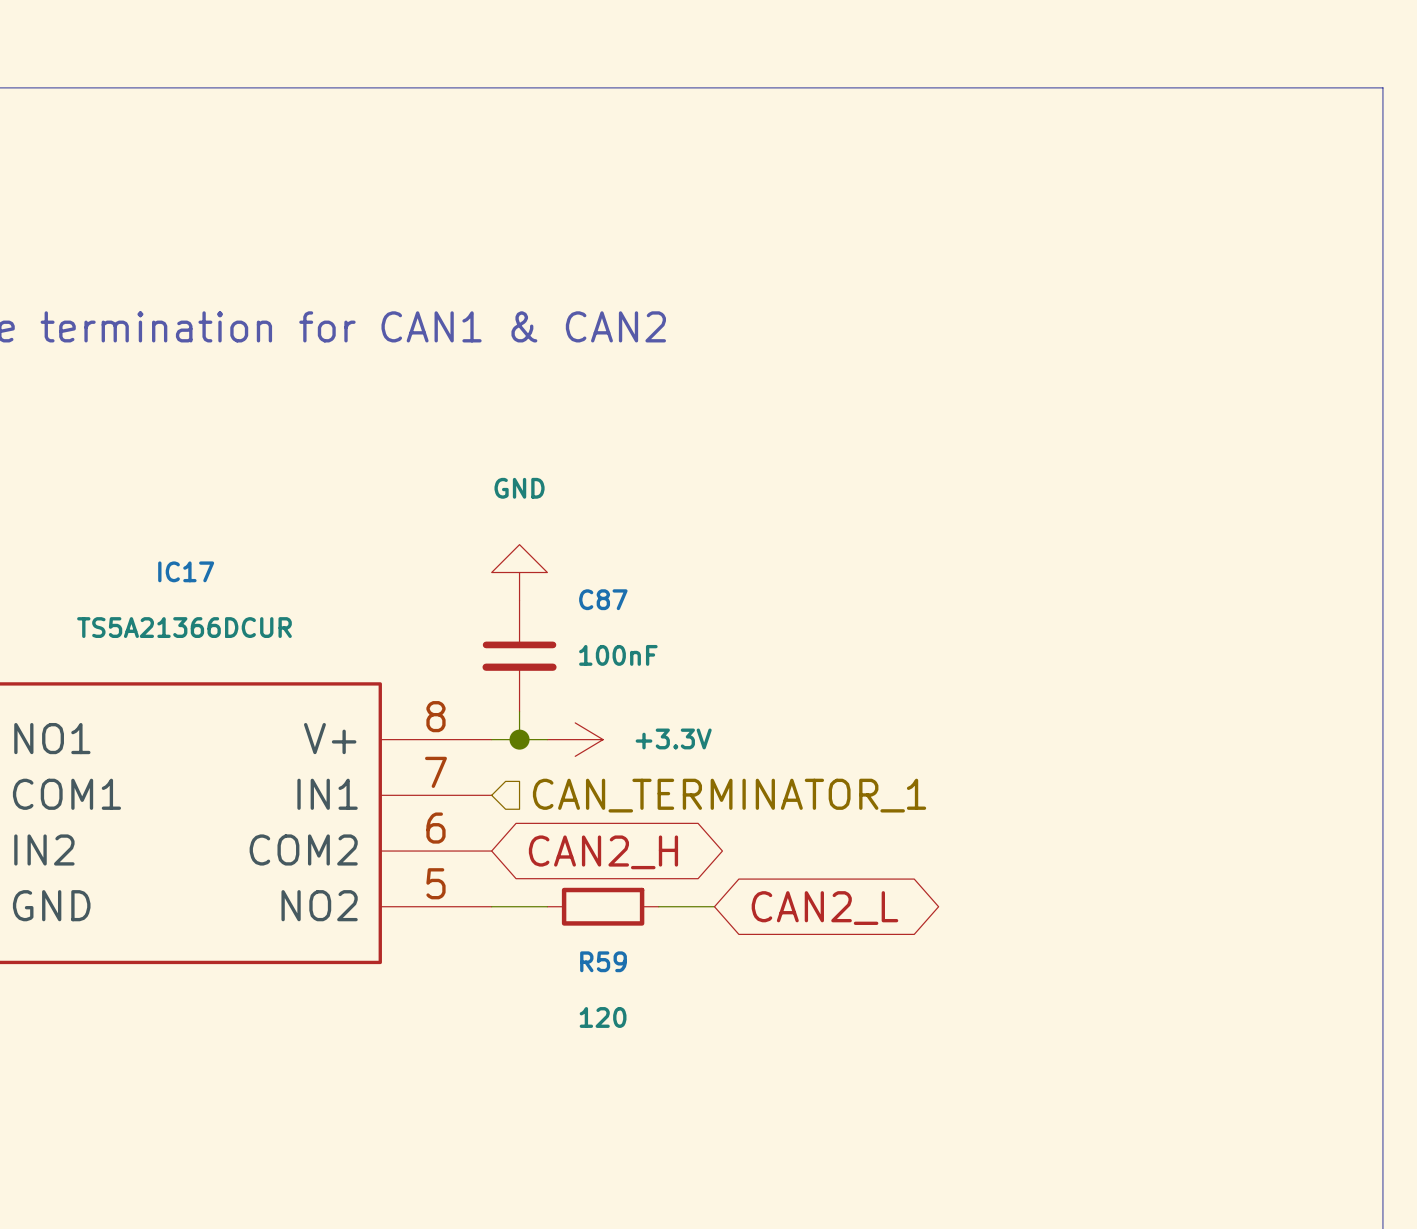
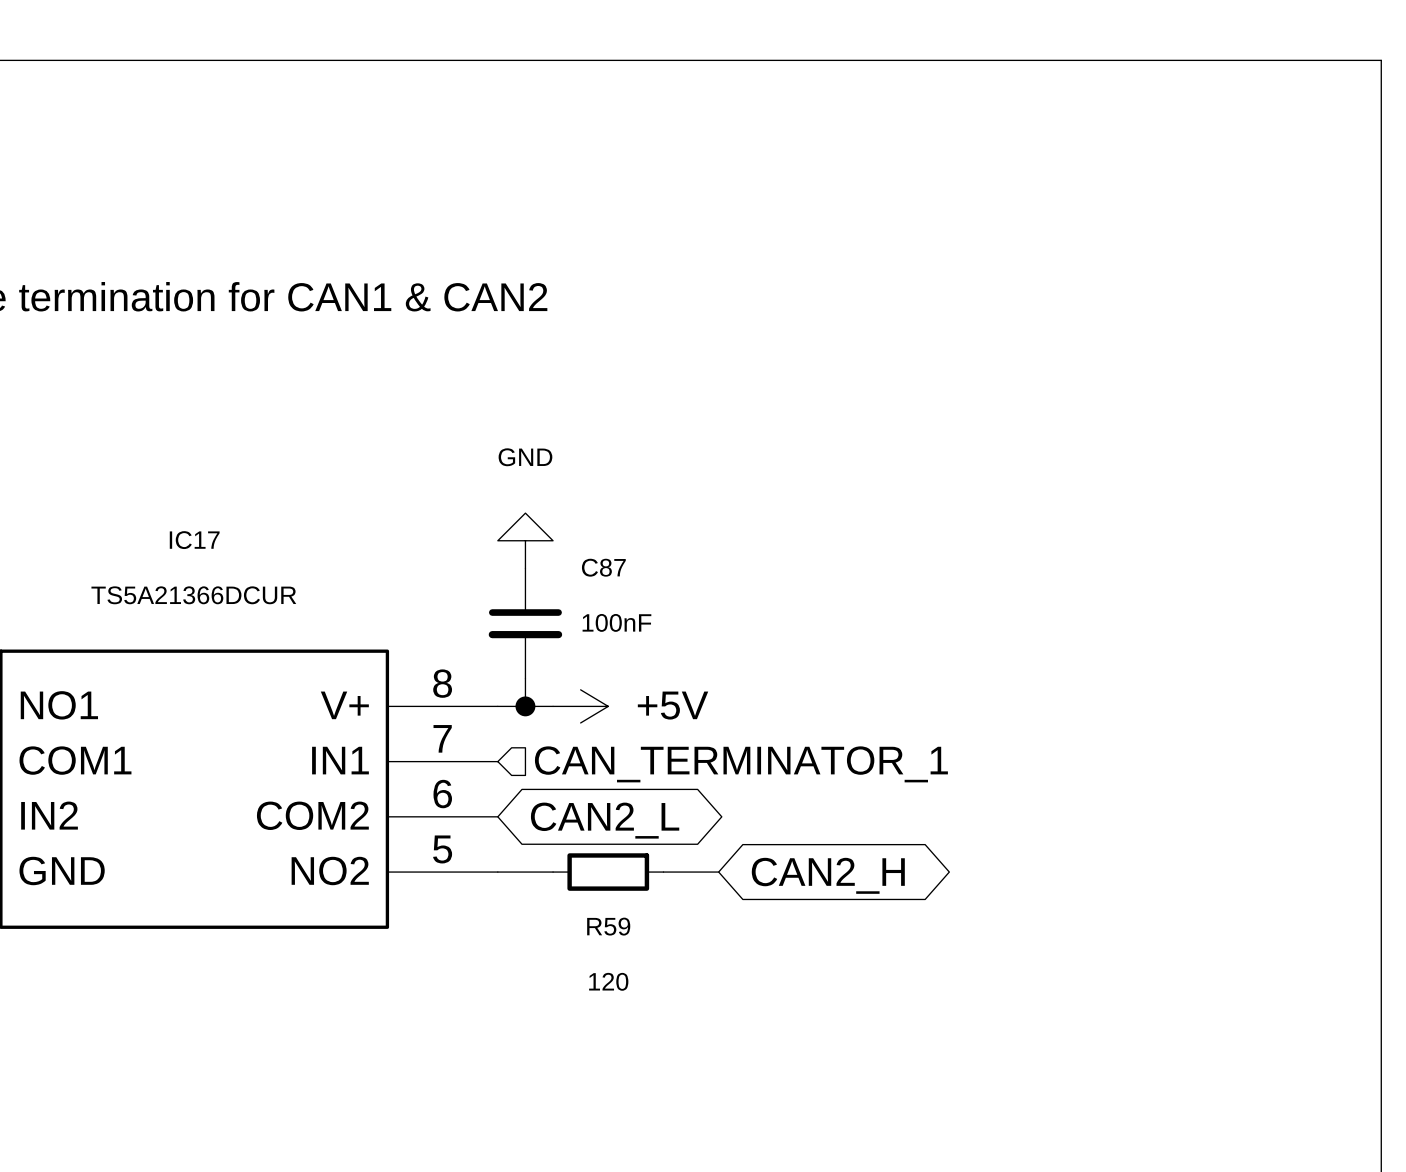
power symbol: +3.3V (575, 739) -> +5V (580, 706)
global label: CAN2_H (603, 852) -> CAN2_L (605, 820)
global label: CAN2_L (824, 908) -> CAN2_H (828, 875)

